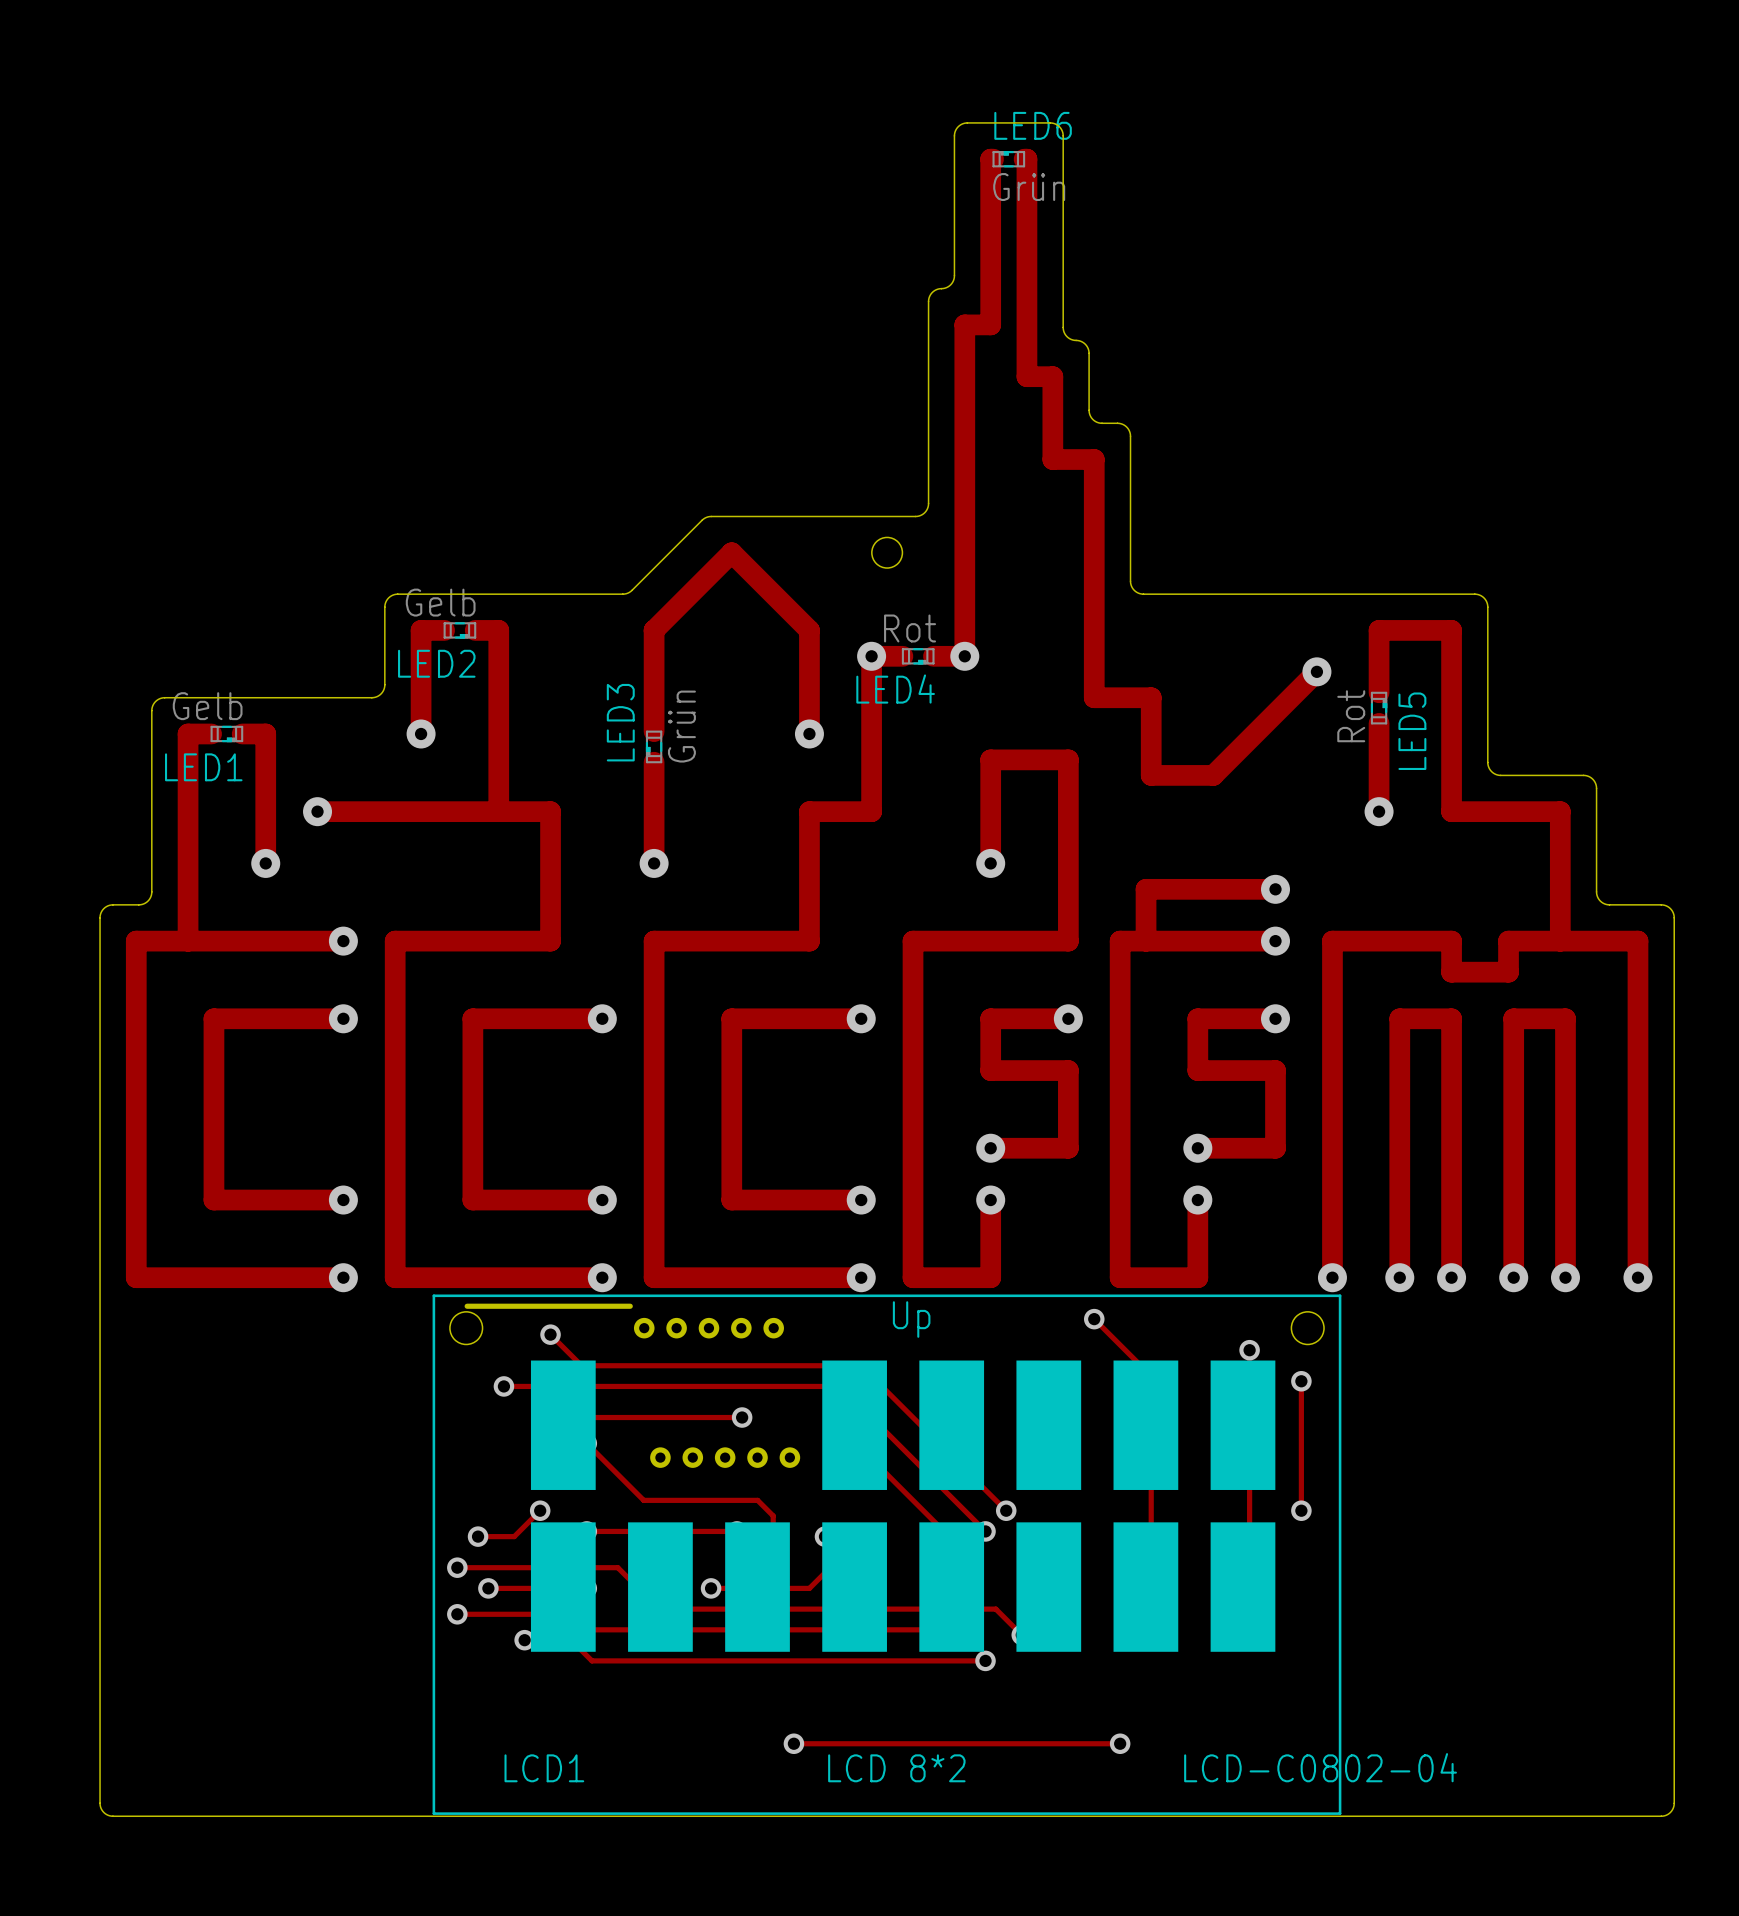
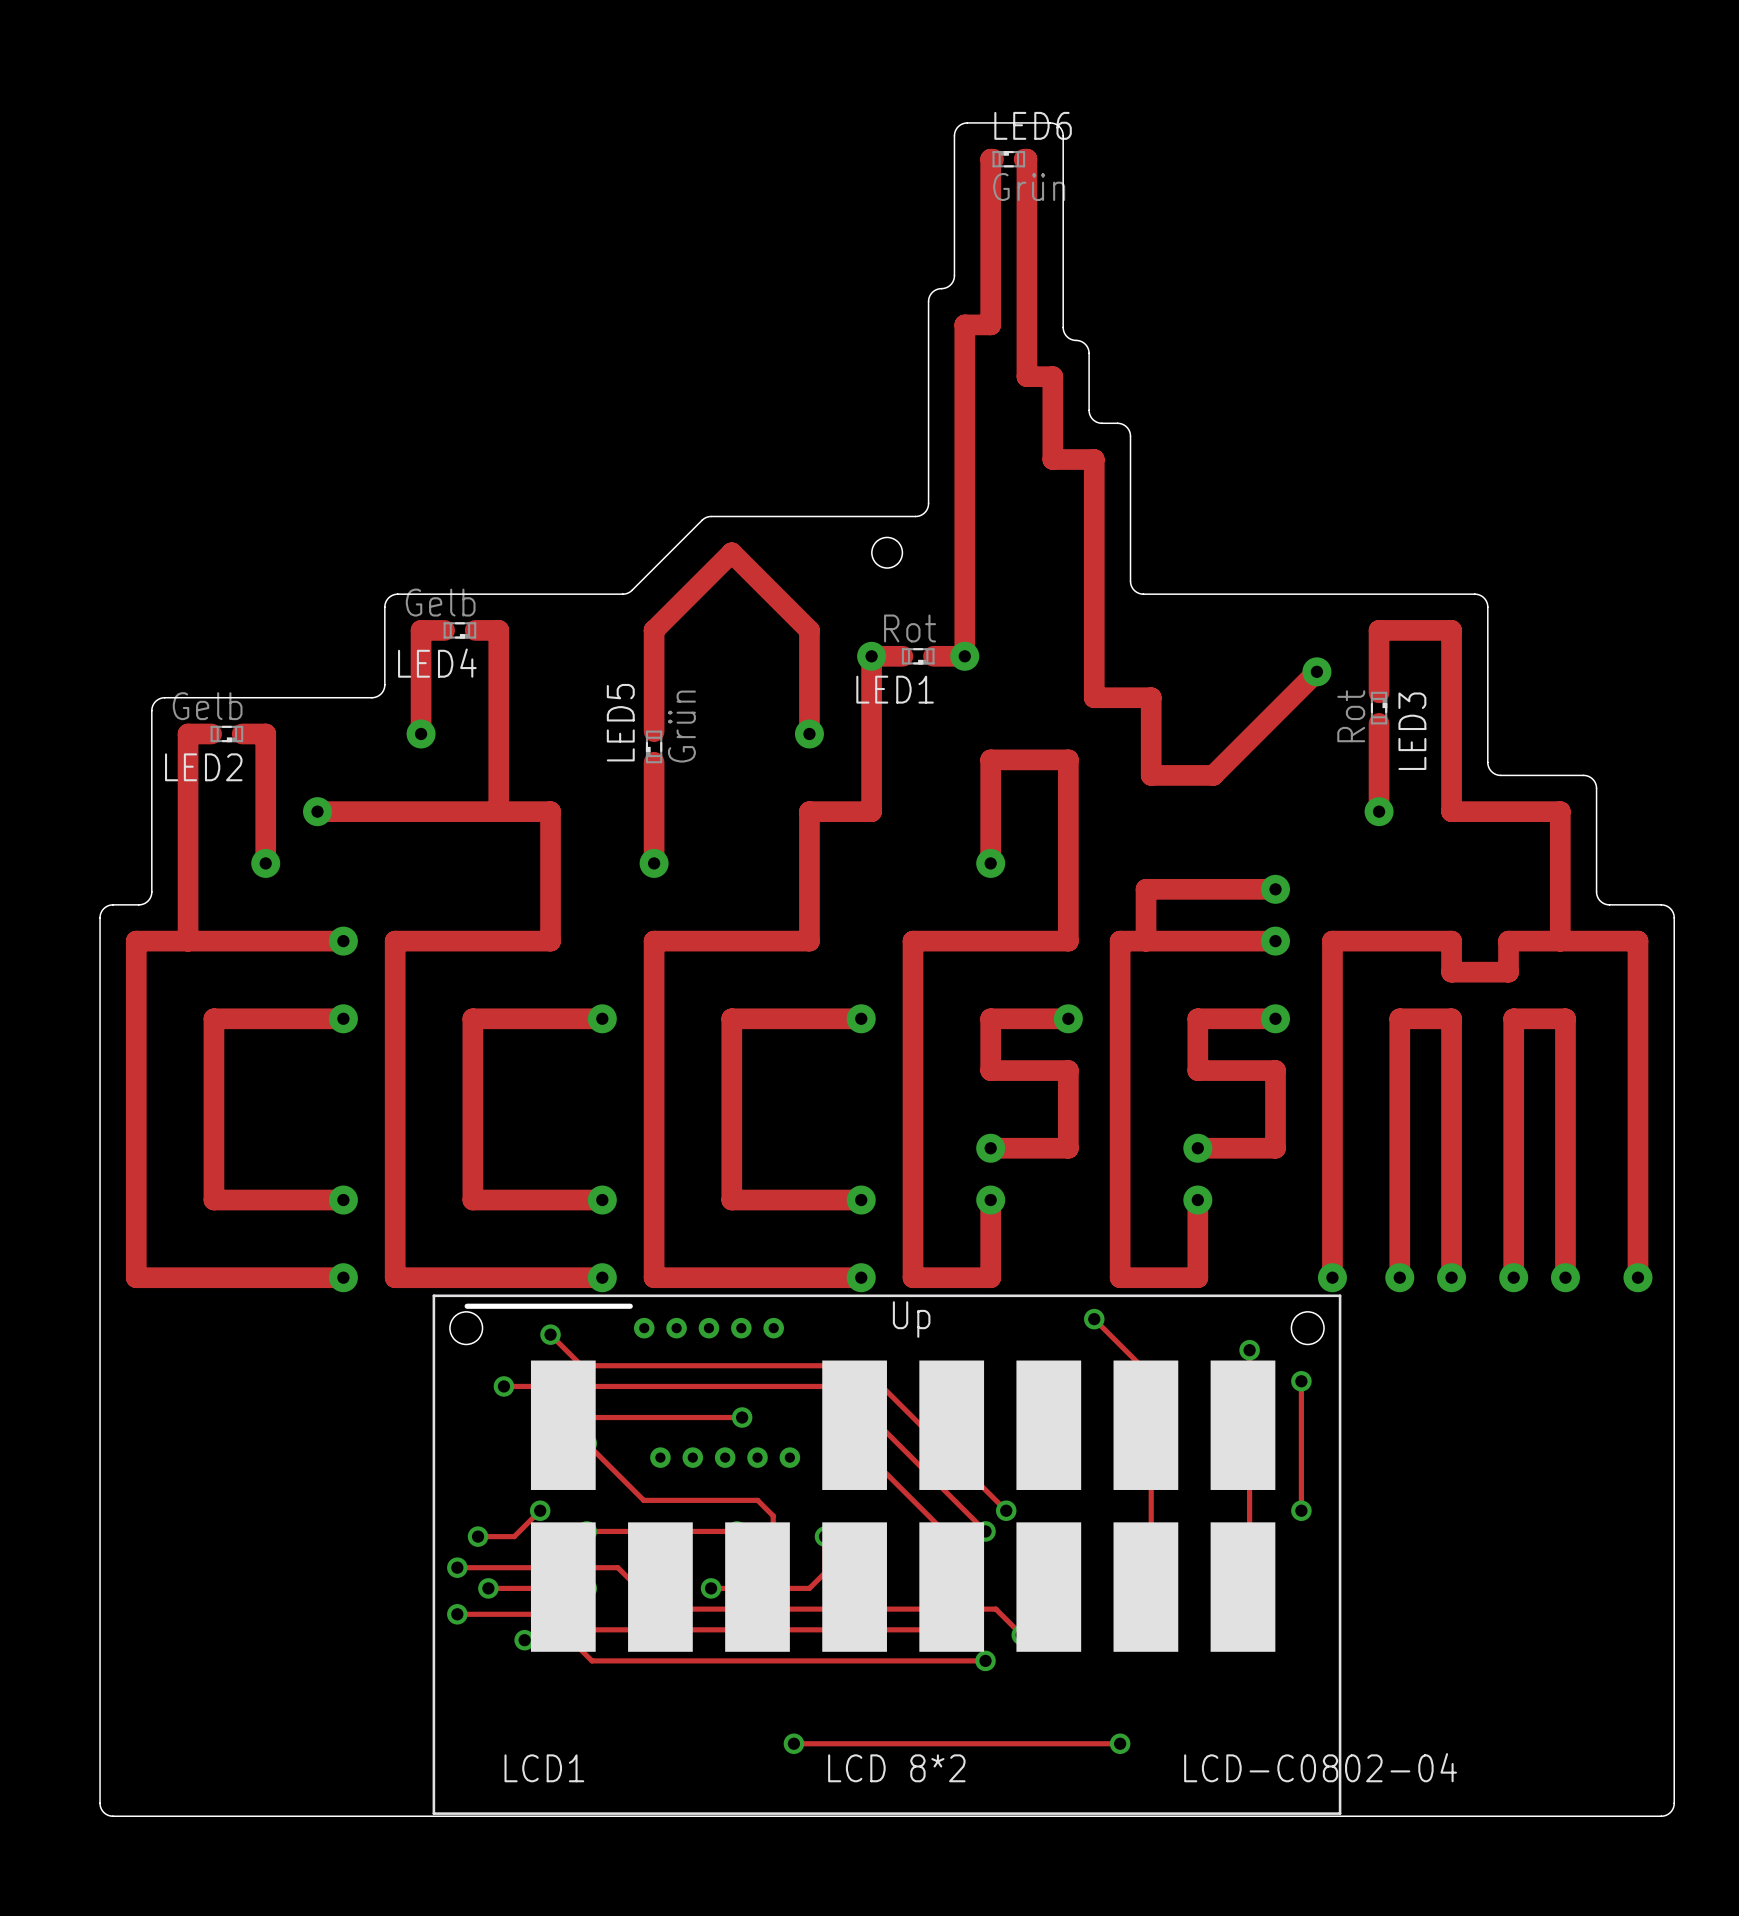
LED2 name: LED2 (436, 663) -> LED4 (437, 663)
LED4 name: LED4 (895, 689) -> LED1 (895, 689)
LED3 name: LED3 (620, 722) -> LED5 (620, 722)
LED5 name: LED5 (1412, 731) -> LED3 (1412, 731)
LED1 name: LED1 (203, 767) -> LED2 (203, 767)

